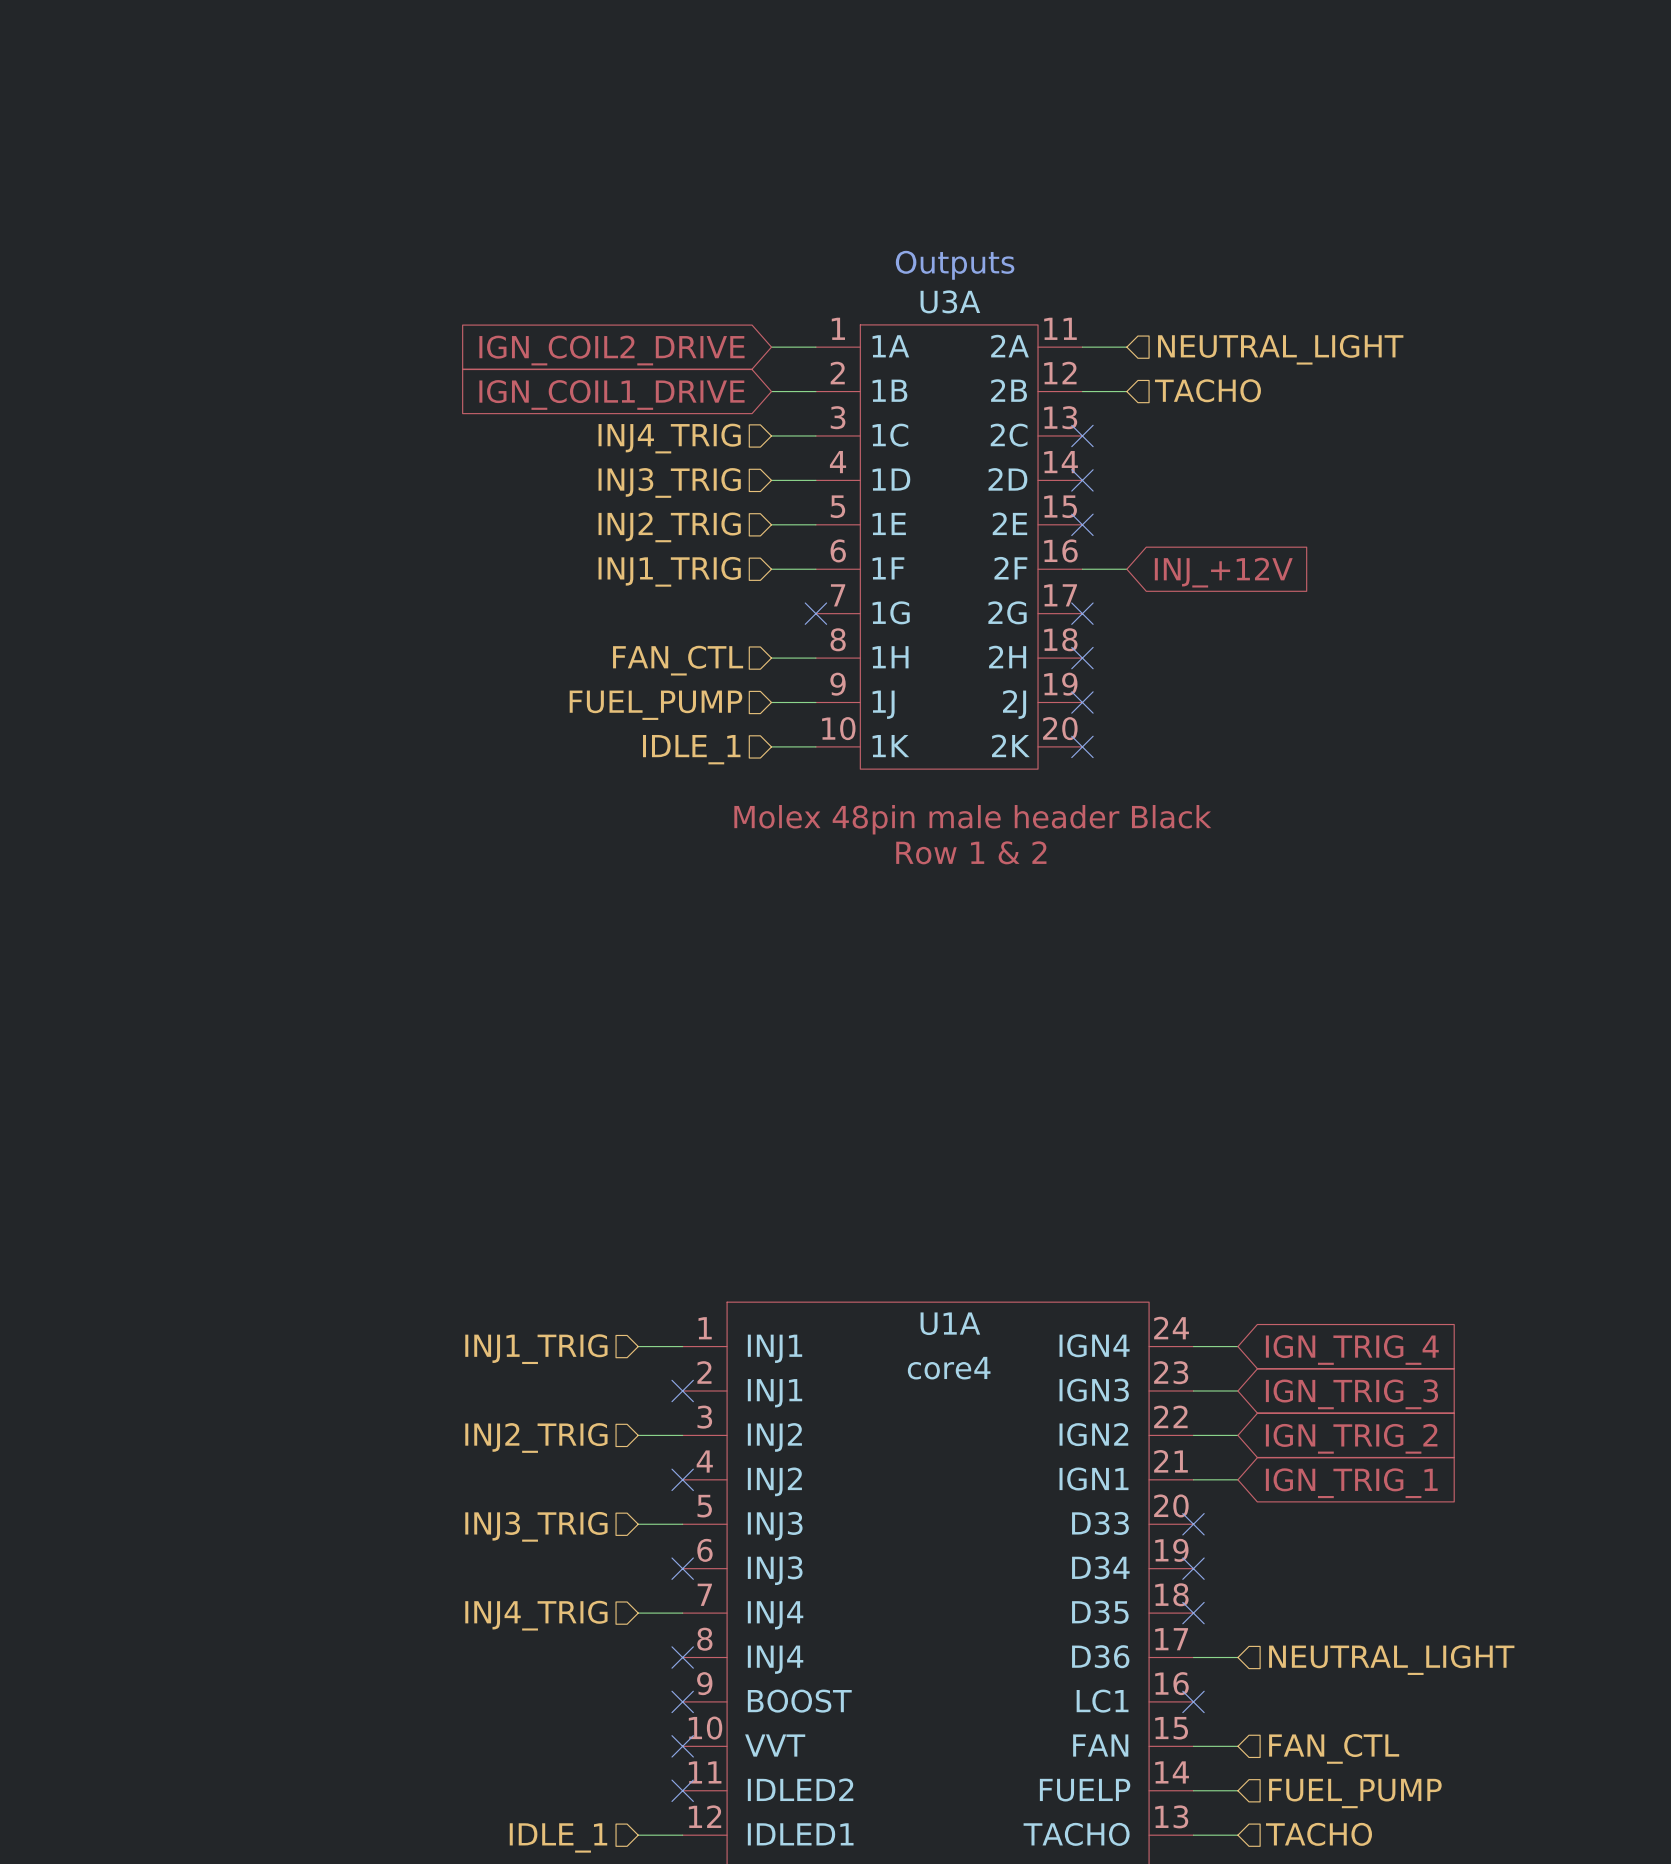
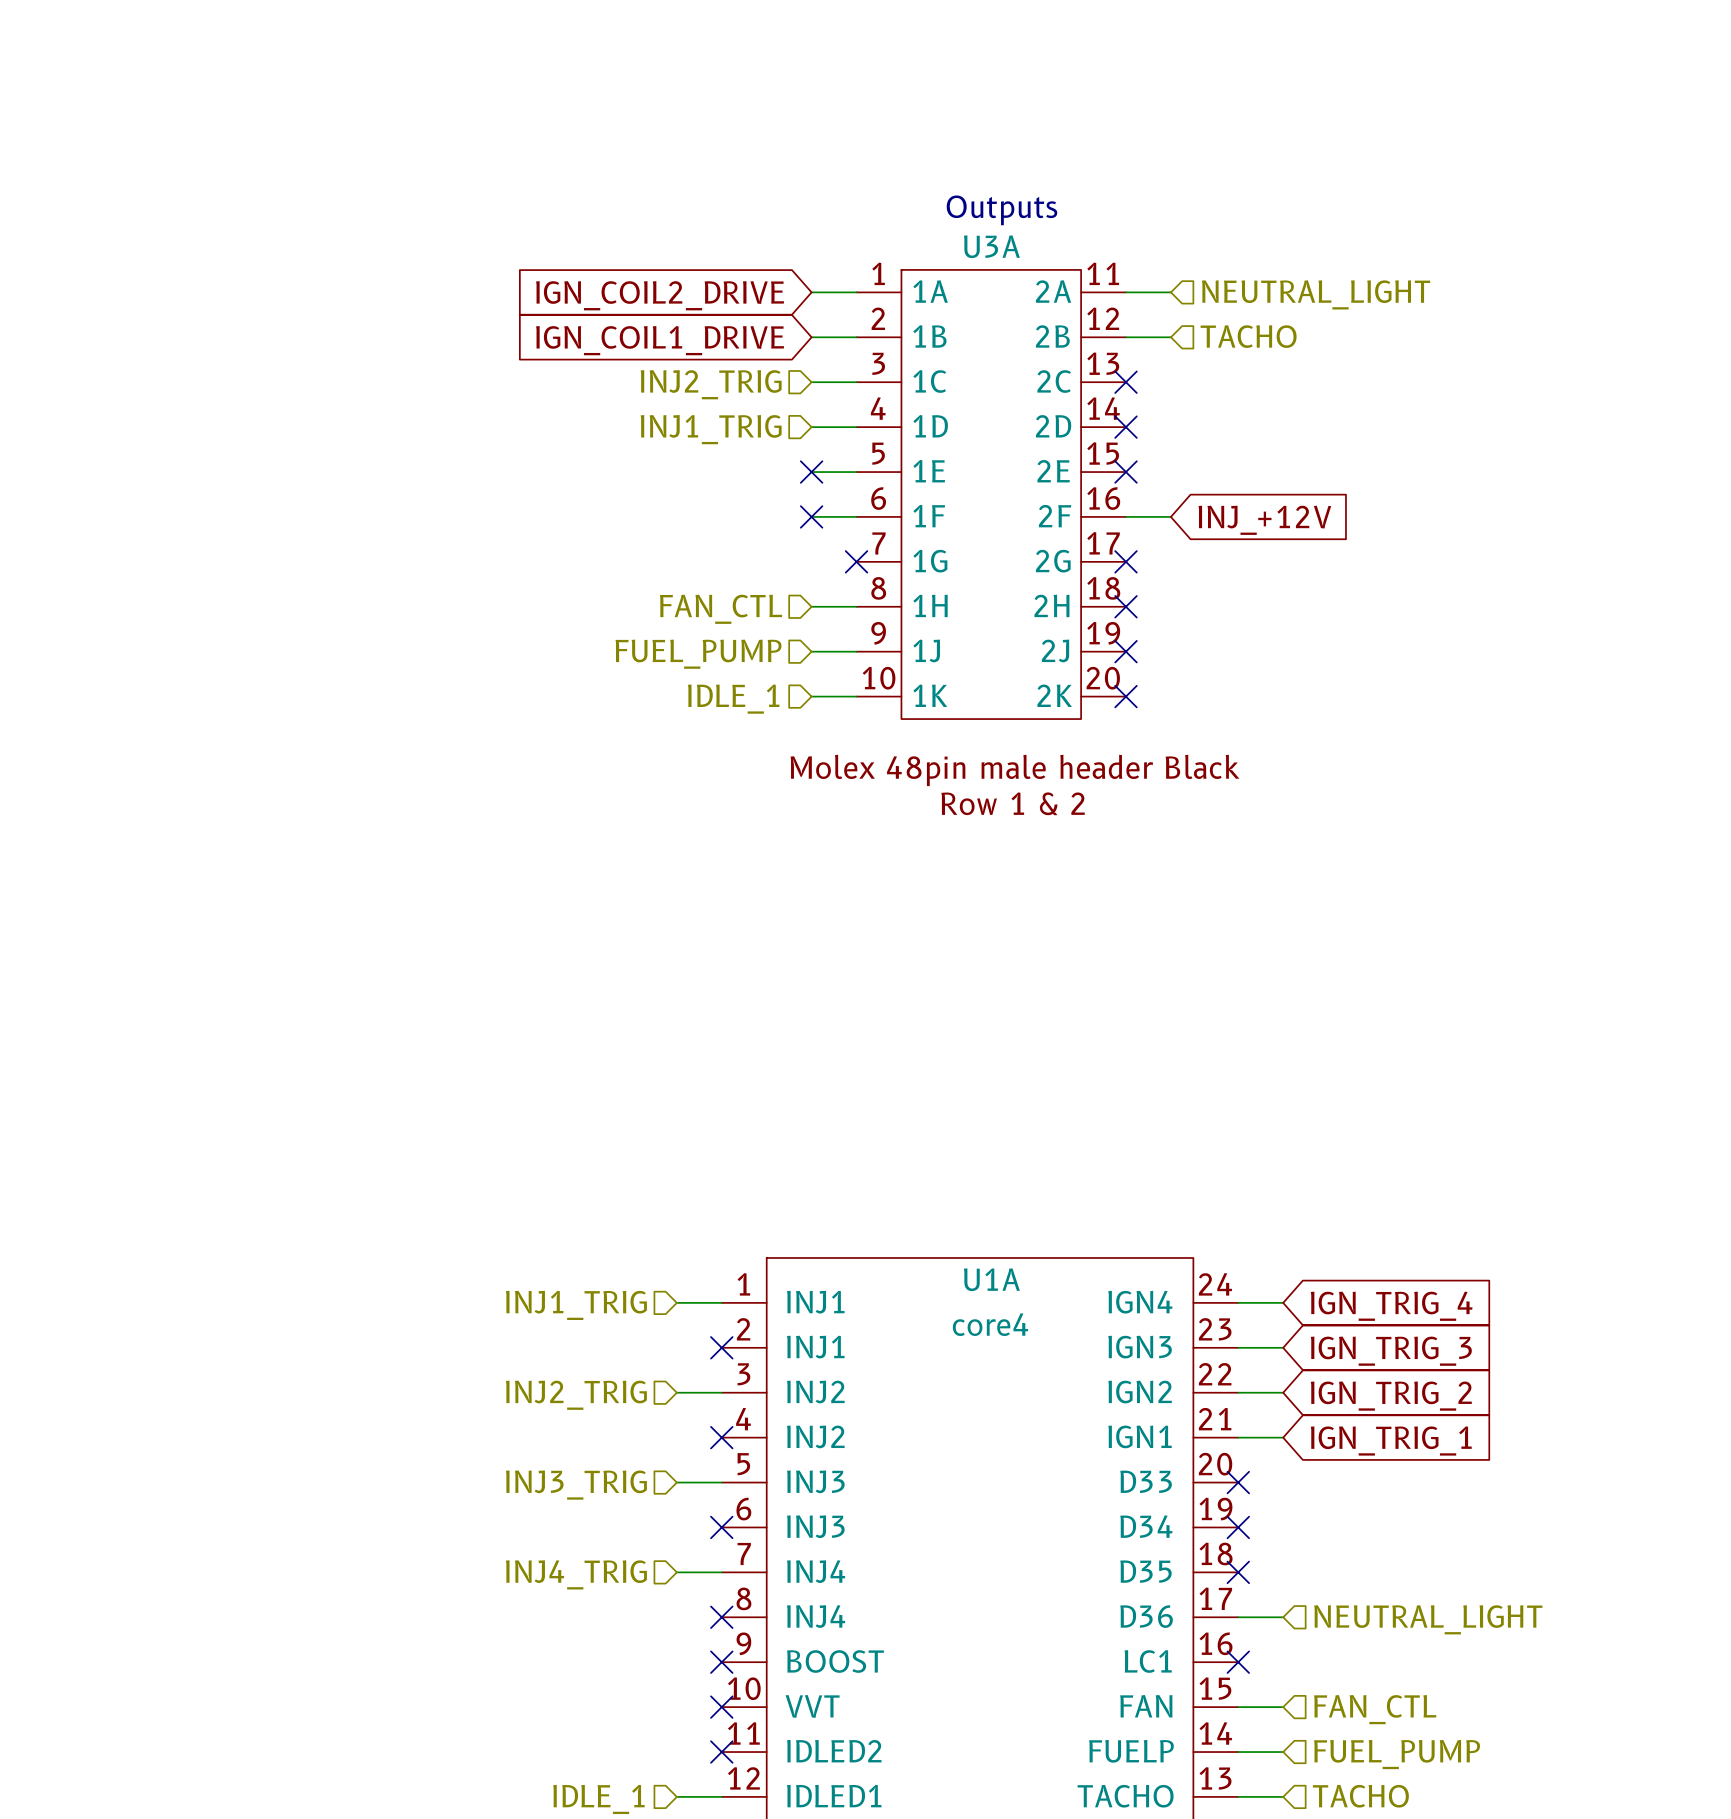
hierarchical label: INJ4_TRIG (669, 438) -> INJ2_TRIG (711, 384)
hierarchical label: INJ3_TRIG (669, 482) -> INJ1_TRIG (711, 429)
no-connect mark: none -> (811, 472)
hierarchical label: INJ2_TRIG (669, 527) -> none
no-connect mark: none -> (811, 516)
hierarchical label: INJ1_TRIG (669, 571) -> none

